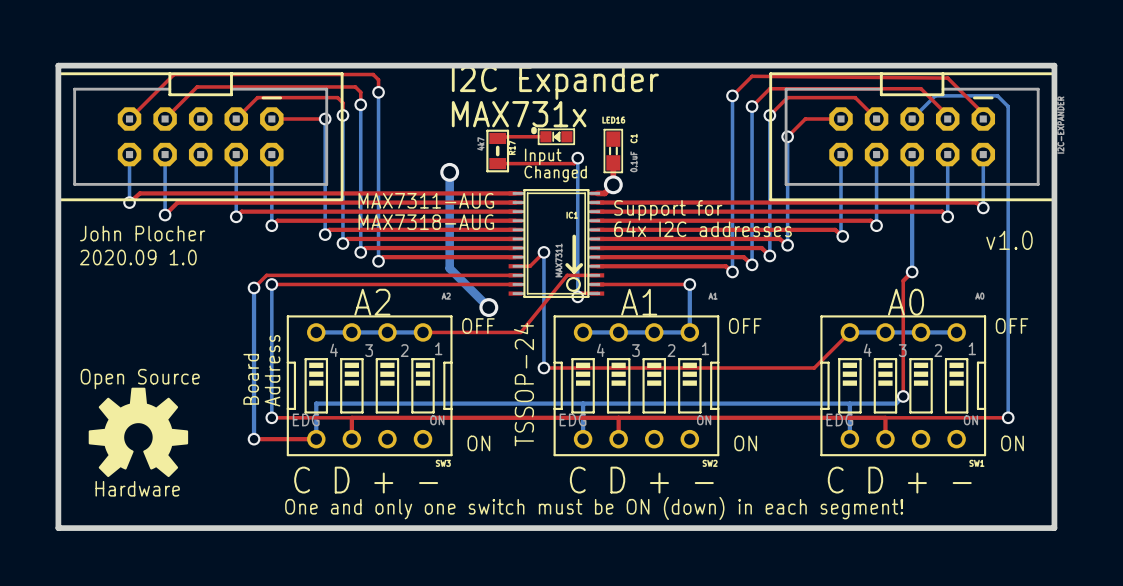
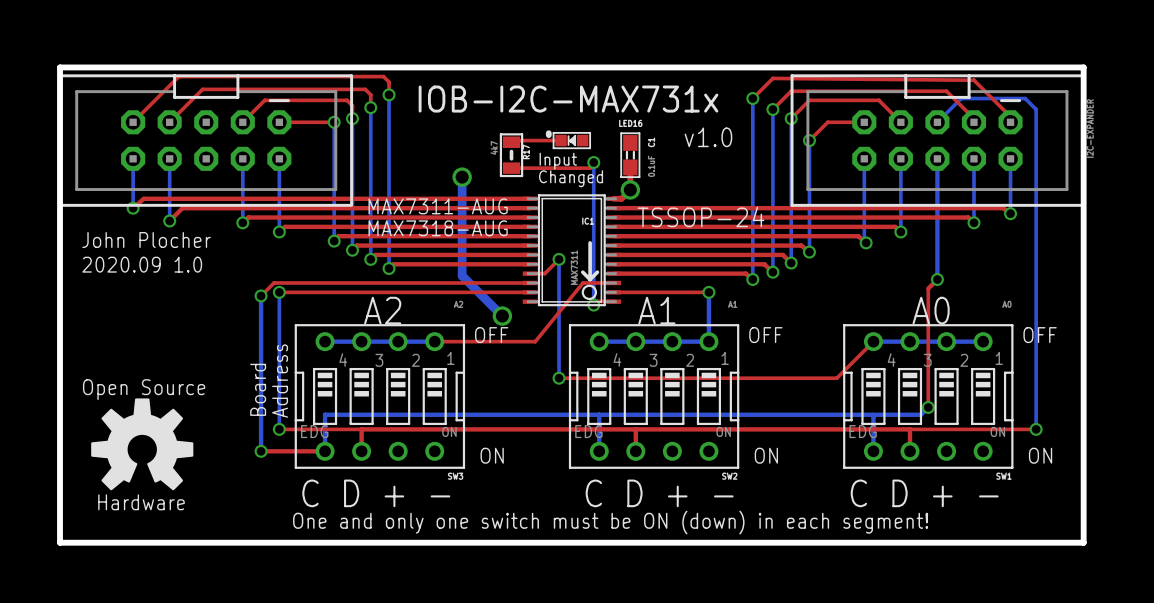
text: I2C Expander (555, 82) -> none
text: MAX731x (519, 114) -> IOB-I2C-MAX731x (568, 99)
text: Support for (668, 210) -> none
text: 64x I2C addresses (703, 228) -> none
text position: v1.0 (1009, 240) -> v1.0 (708, 137)
text rotation: 0° (523, 384) -> 90° clockwise (701, 216)
text position: TSSOP-24 (523, 384) -> TSSOP-24 (701, 216)

